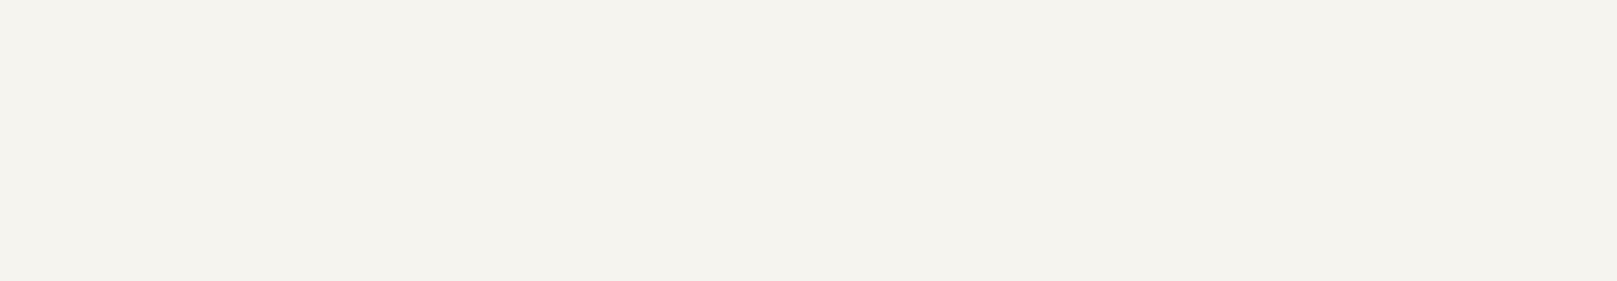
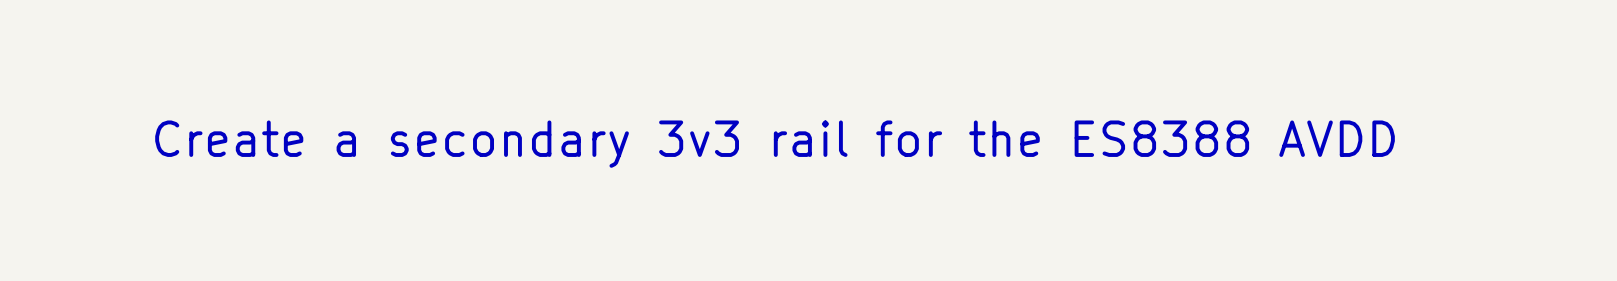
text: none -> Create a secondary 3v3 rail for the ES8388 AVDD (775, 144)

